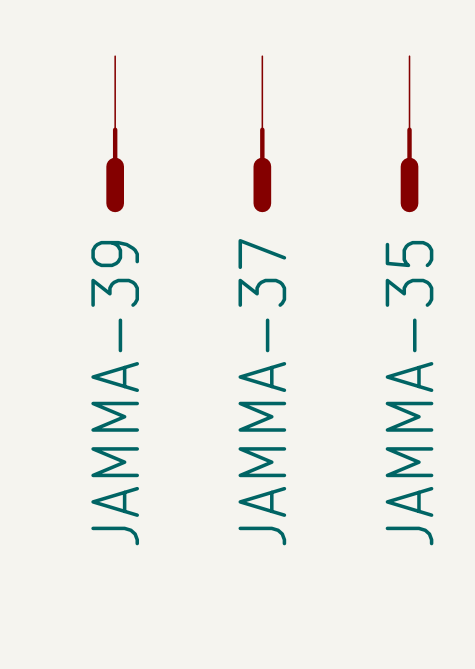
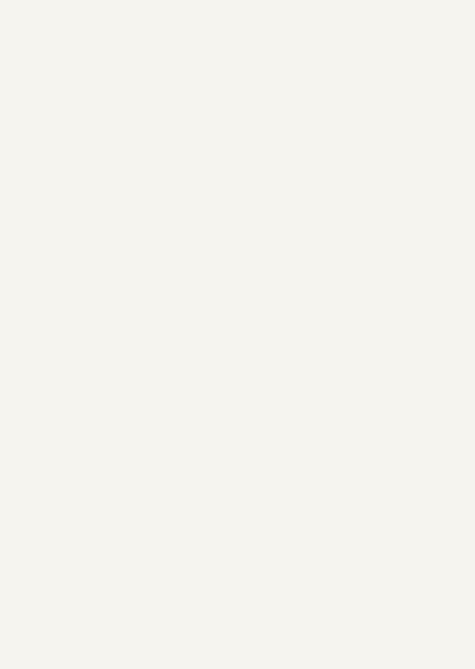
JAMMA-39: (115, 134) -> none
JAMMA-37: (262, 134) -> none
JAMMA-35: (409, 134) -> none

